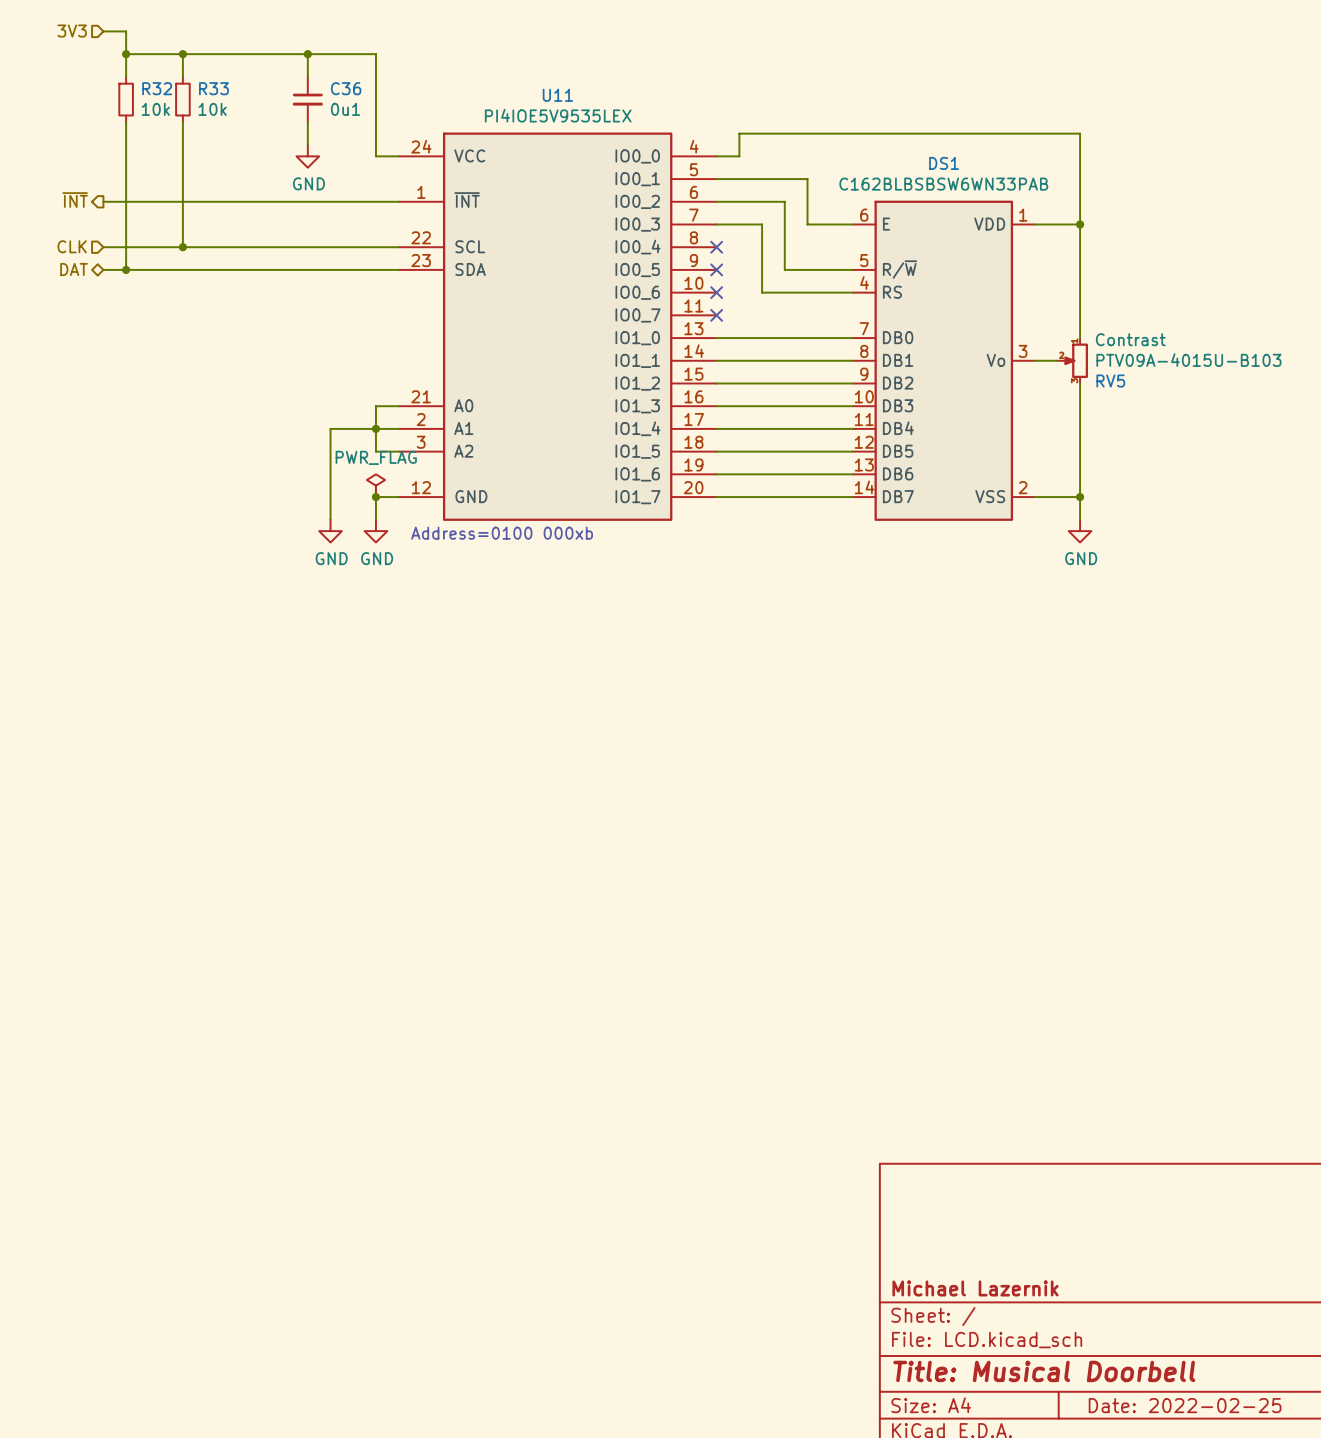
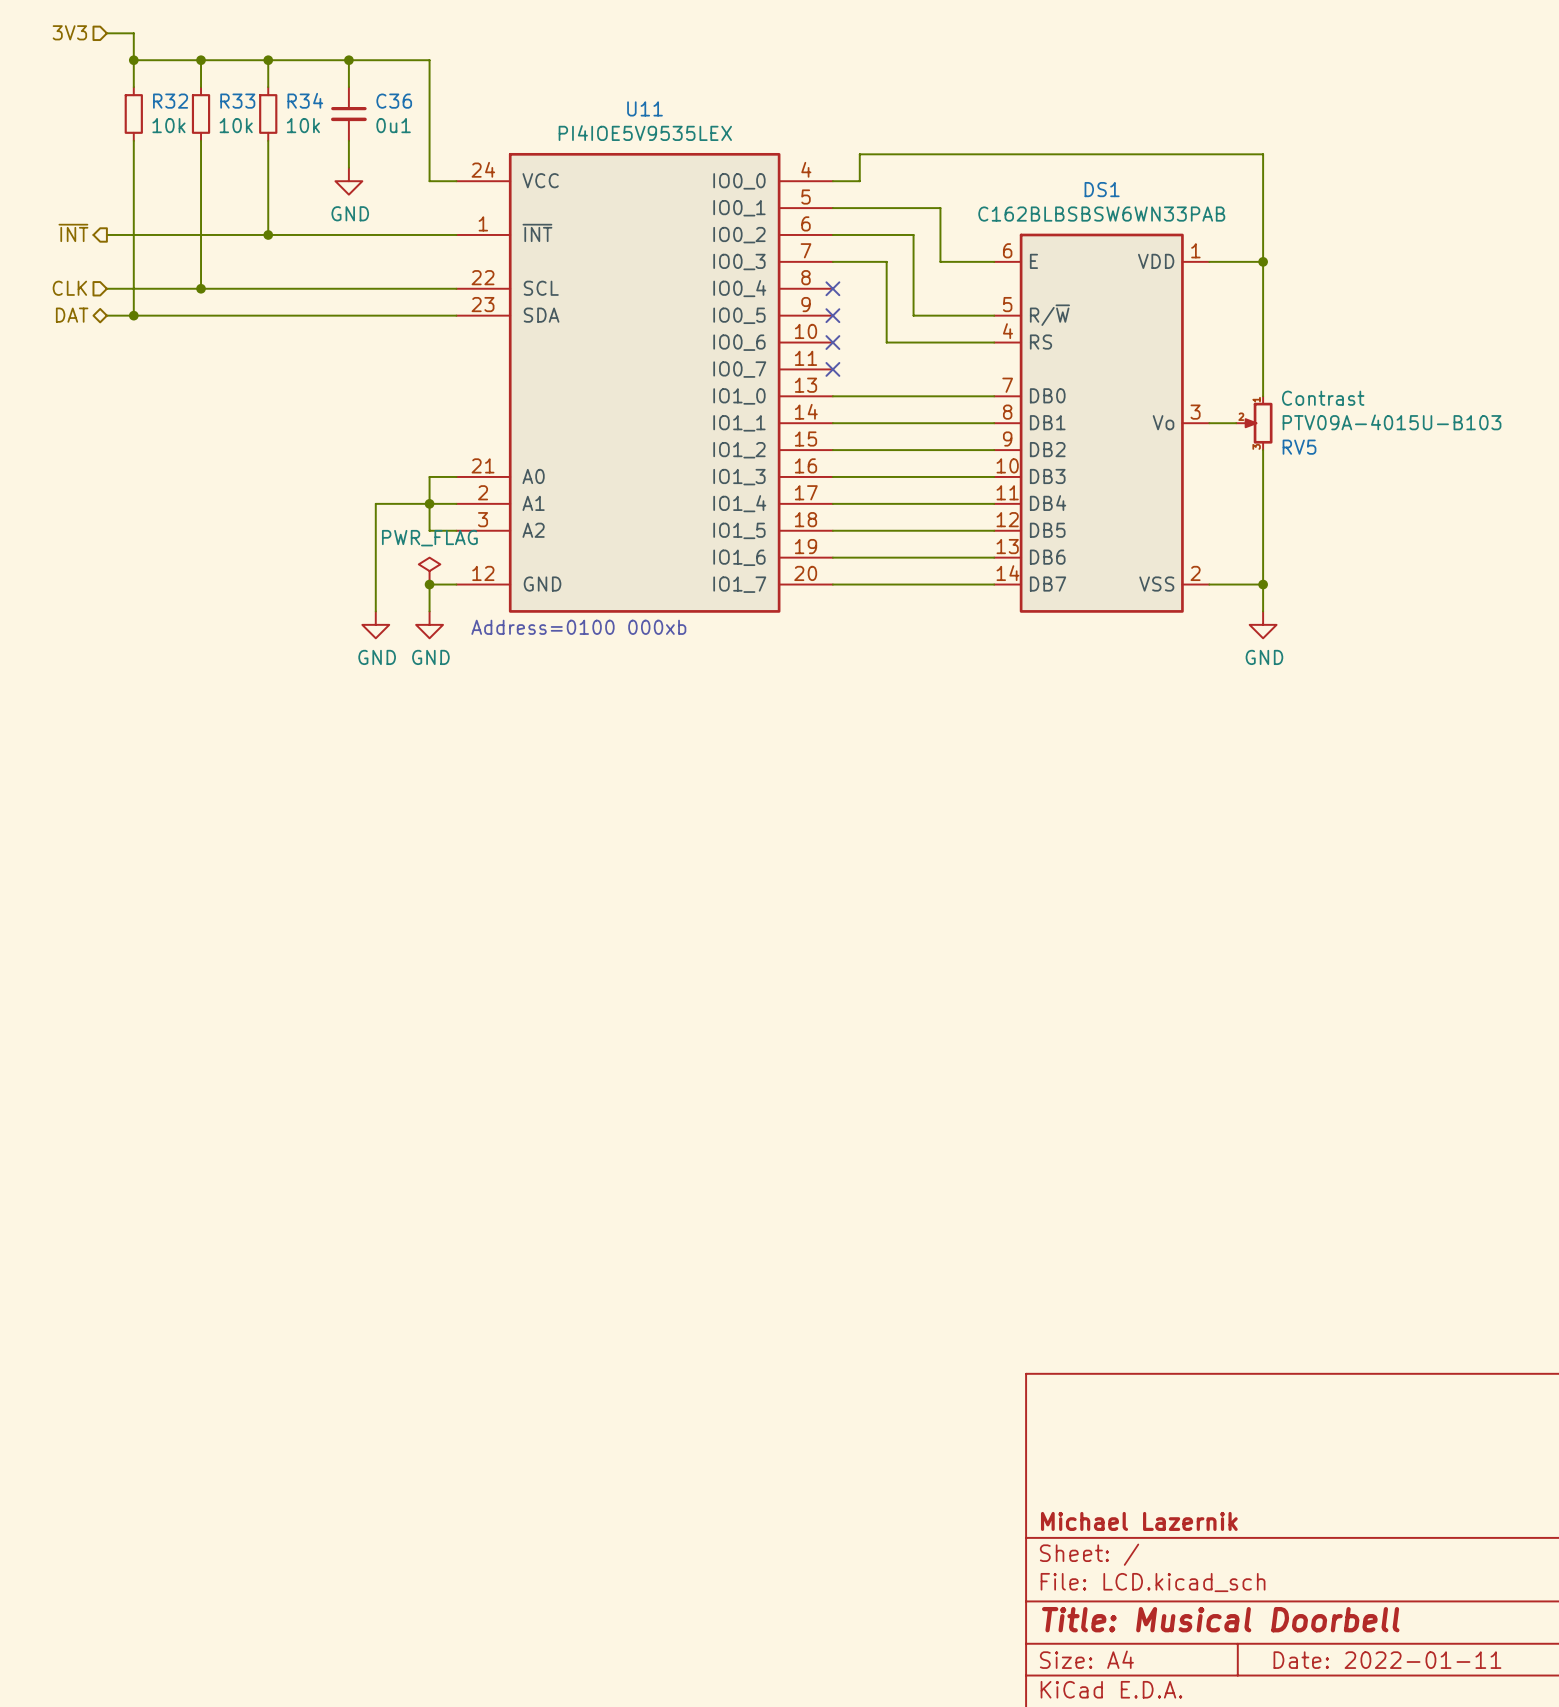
wire: none -> (268, 60) (268, 87)
junction: none -> (268, 60)
R34: none -> 10k (268, 113)
wire: none -> (268, 140) (268, 234)
junction: none -> (268, 234)
title block: Date: 2022-02-25 (1185, 1405) -> Date: 2022-01-11 (1387, 1660)

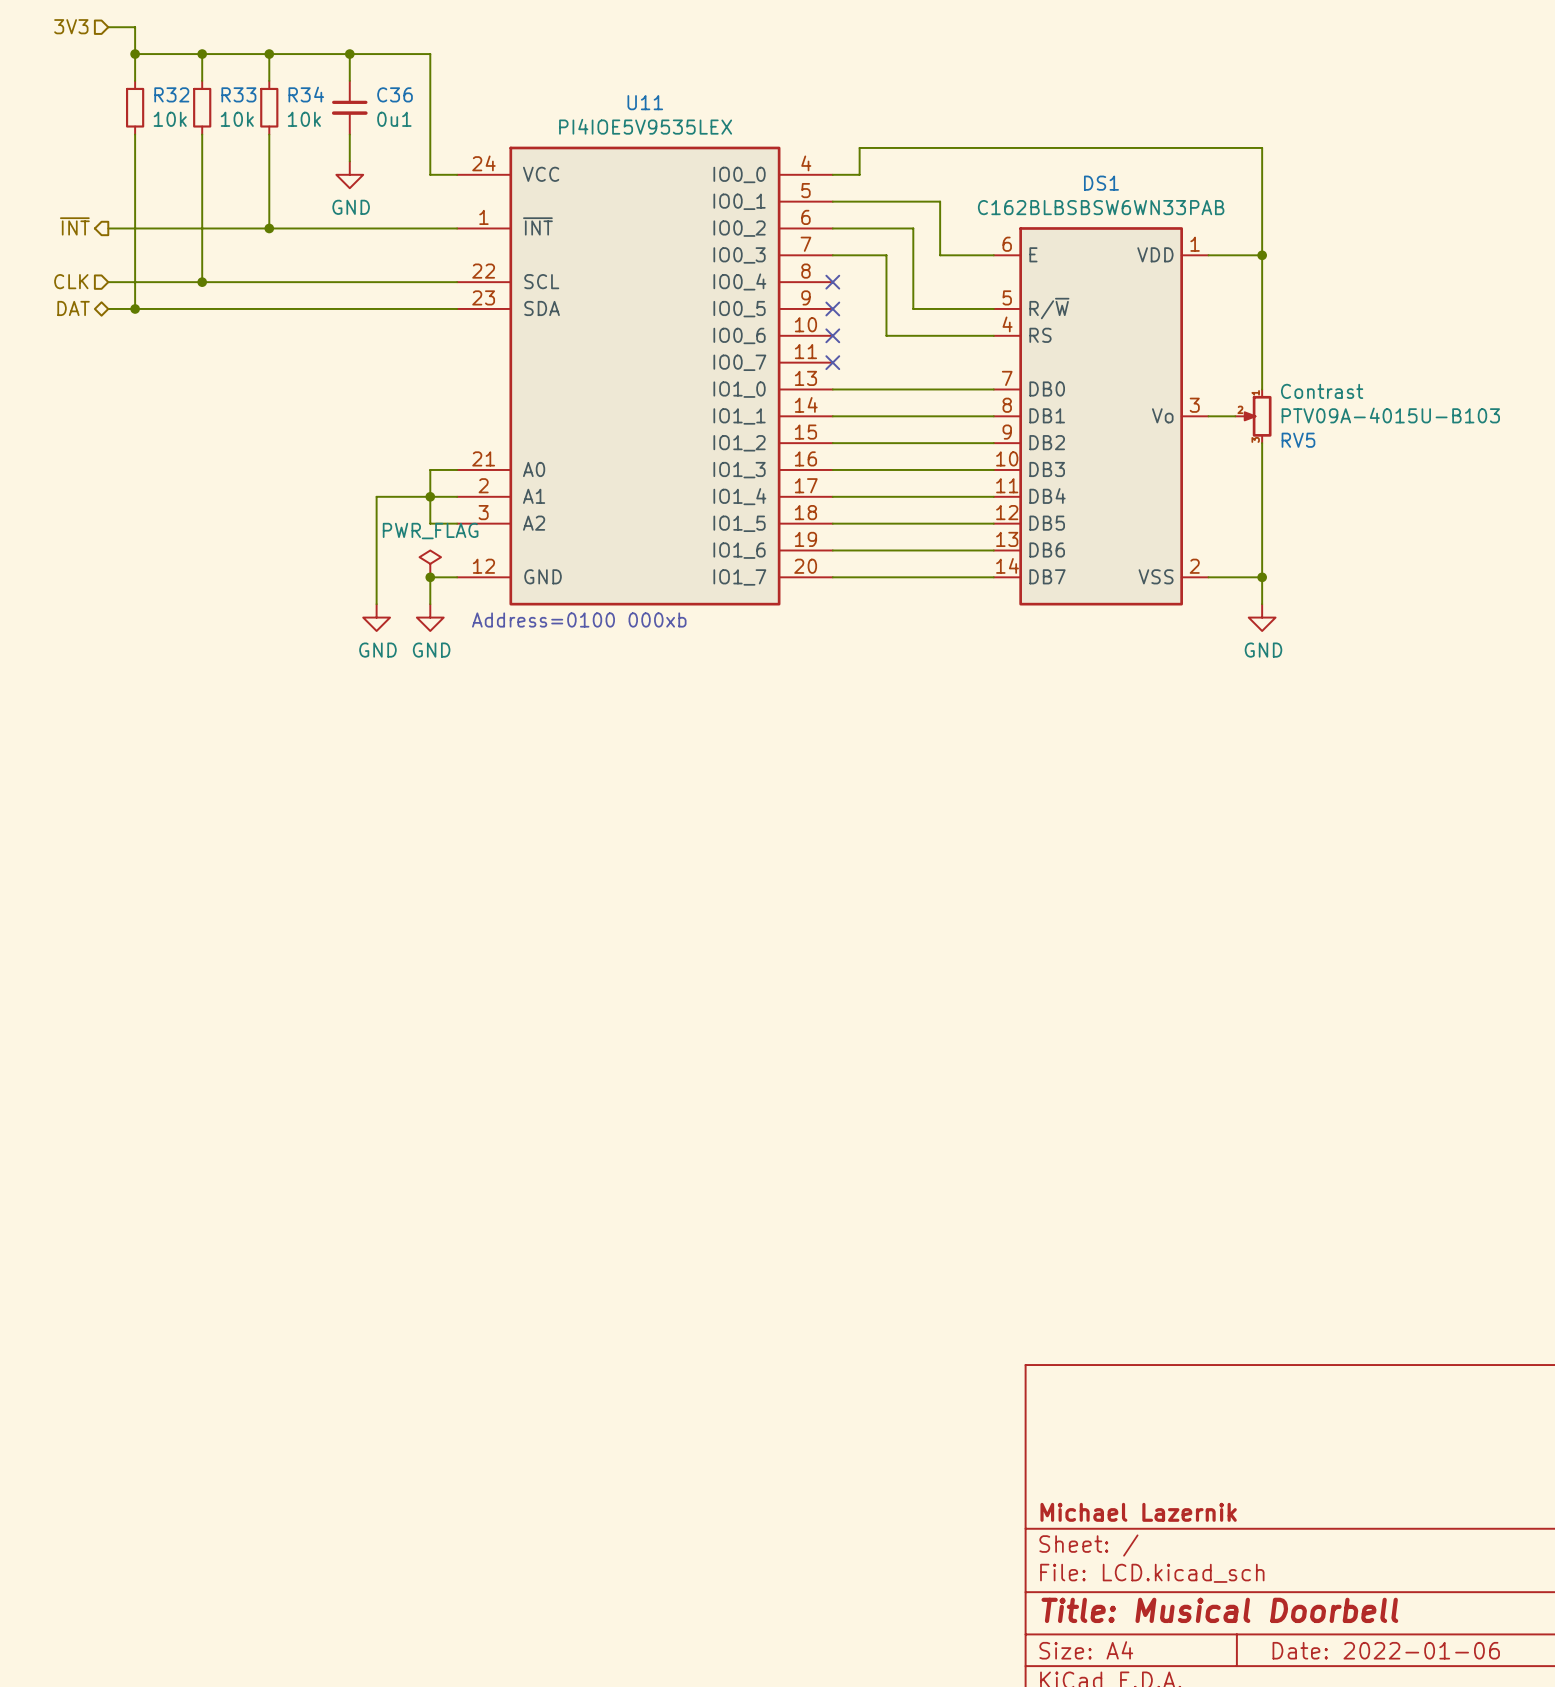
title block: Date: 2022-01-11 (1387, 1660) -> Date: 2022-01-06 (1386, 1650)

